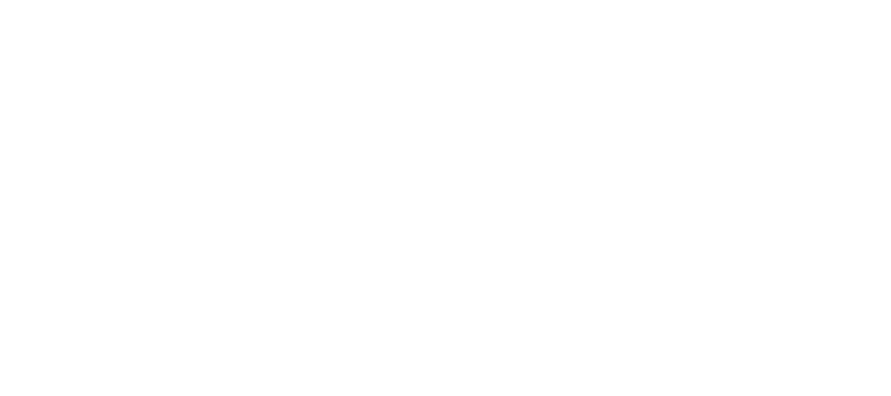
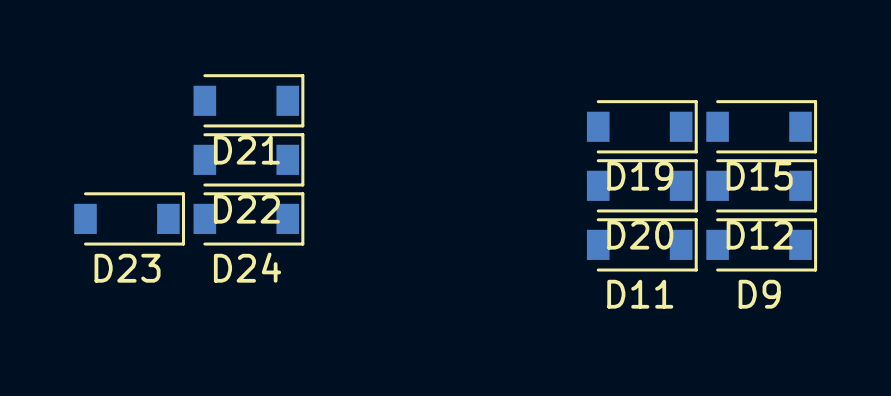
D21: none -> (248, 100)
D19: none -> (642, 126)
D15: none -> (761, 126)
D22: none -> (248, 159)
D20: none -> (642, 185)
D12: none -> (761, 185)
D23: none -> (129, 218)
D24: none -> (248, 218)
D11: none -> (642, 244)
D9: none -> (761, 244)

